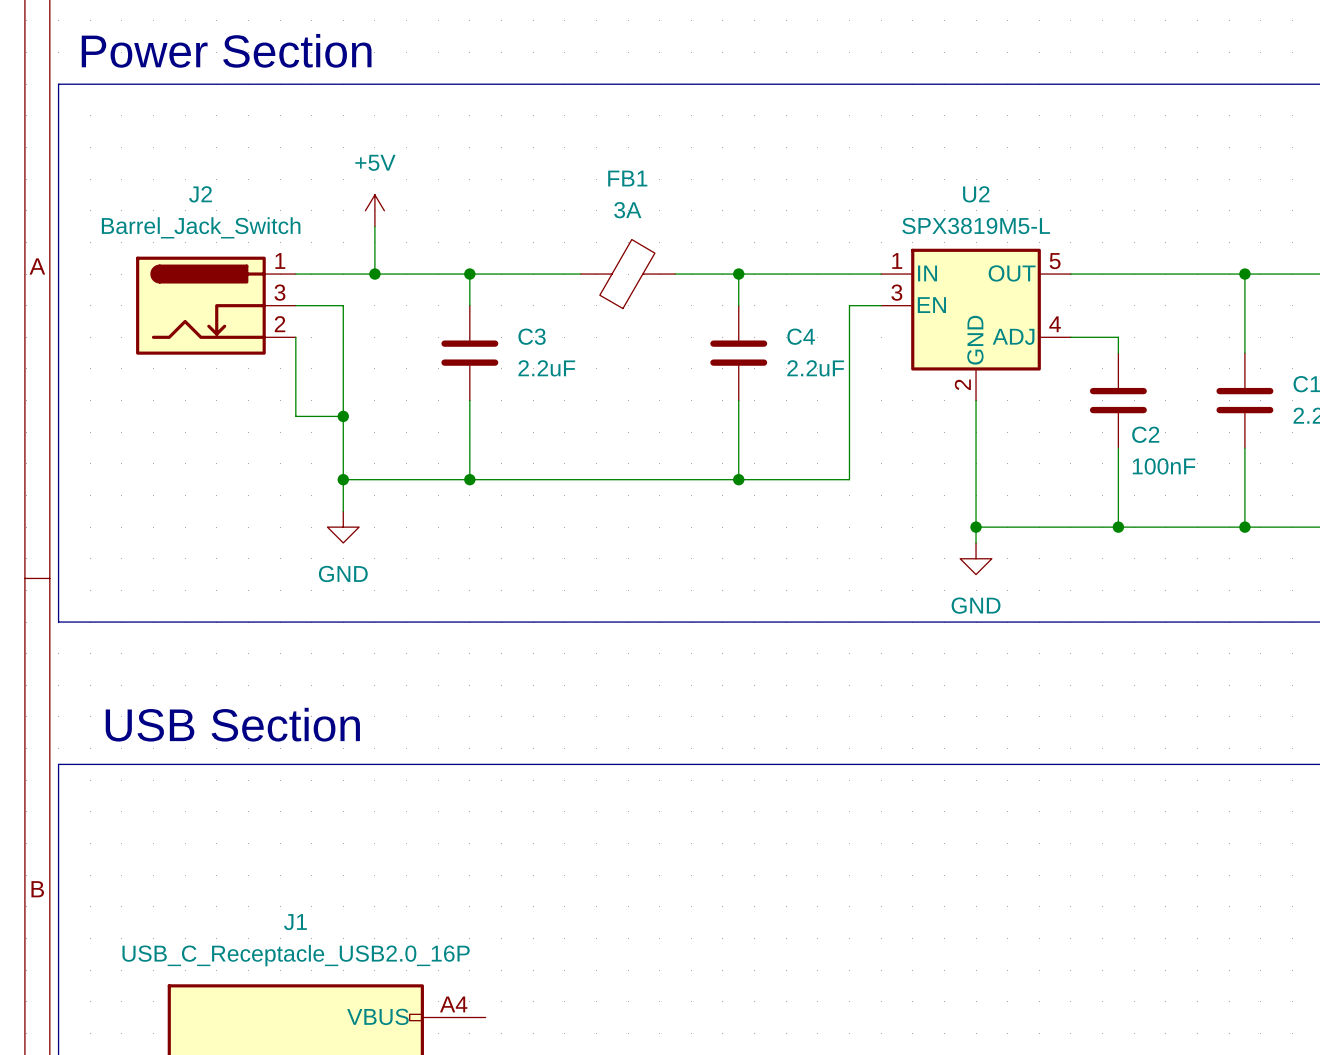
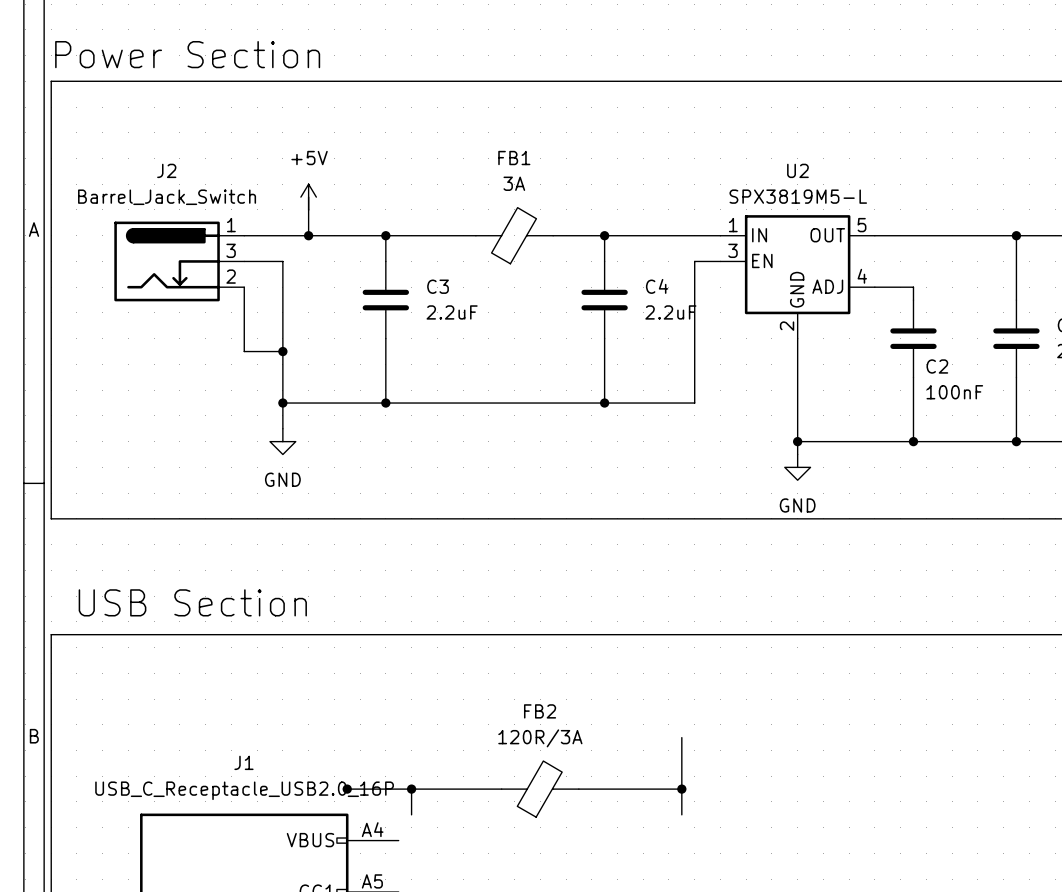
power symbol position: +5V (374, 210) -> +5V (308, 197)
wire: none -> (681, 737) (681, 814)
wire: none -> (347, 789) (501, 789)
junction: none -> (347, 789)
wire: none -> (411, 789) (411, 814)
junction: none -> (411, 789)
FB2: none -> 120R/3A (540, 789)
wire: none -> (578, 789) (681, 789)
junction: none -> (681, 789)

